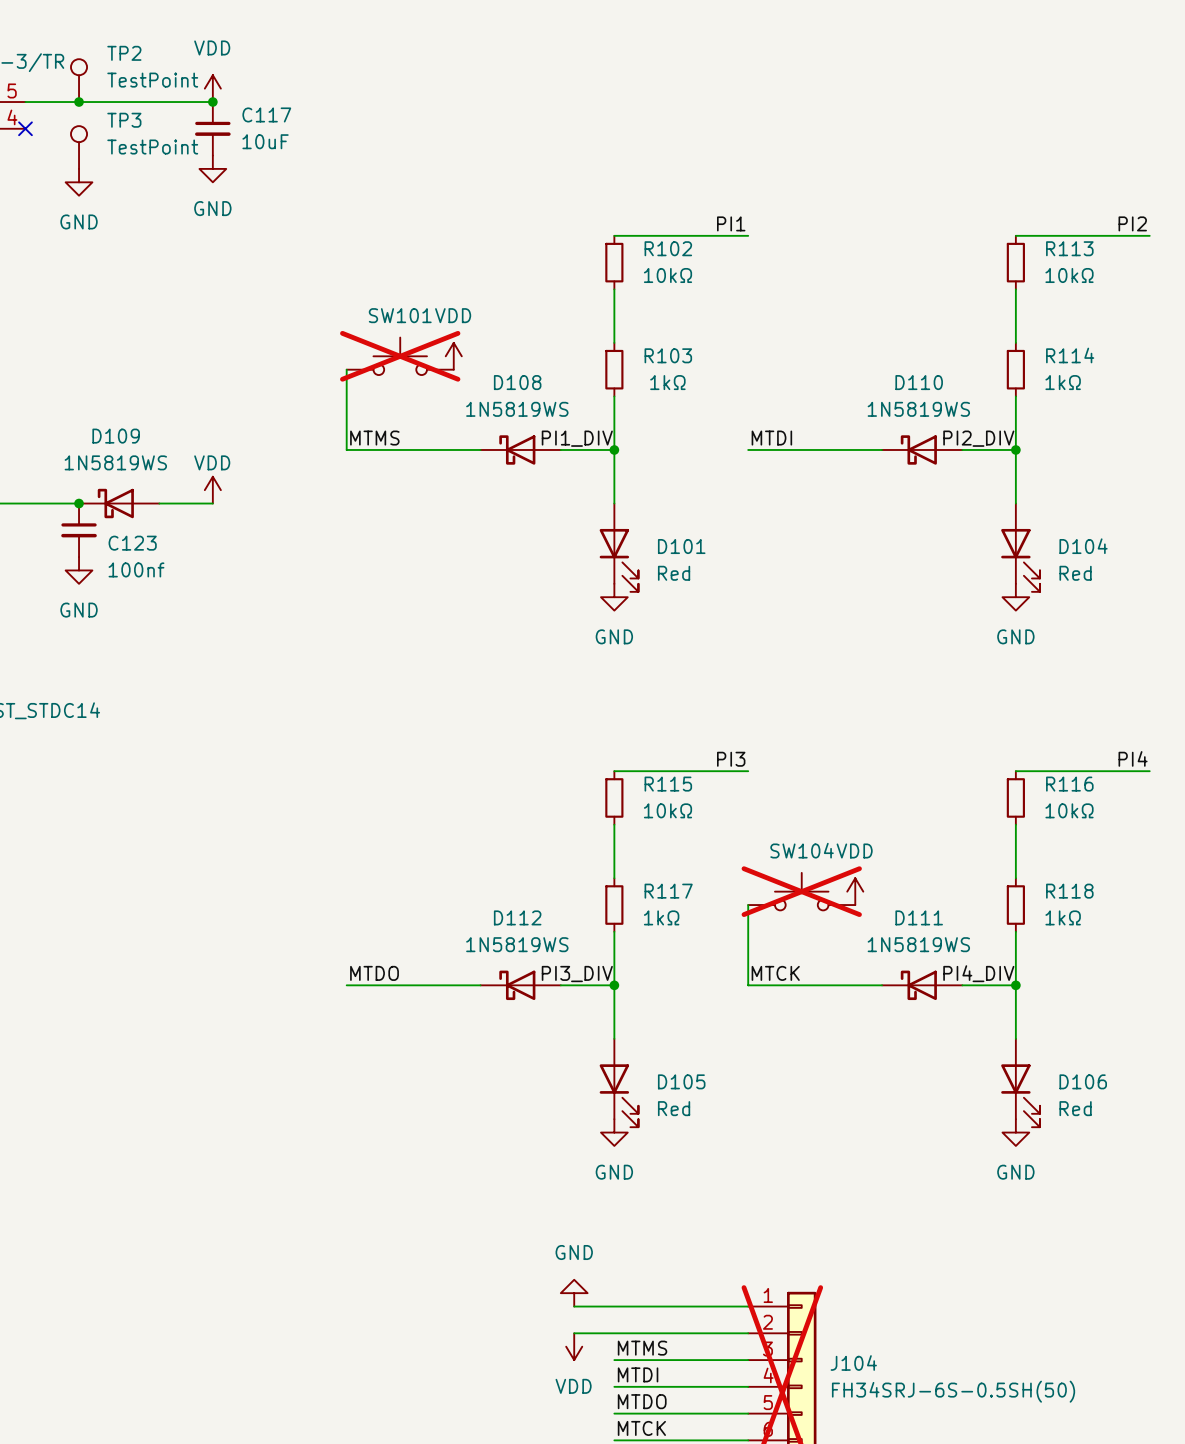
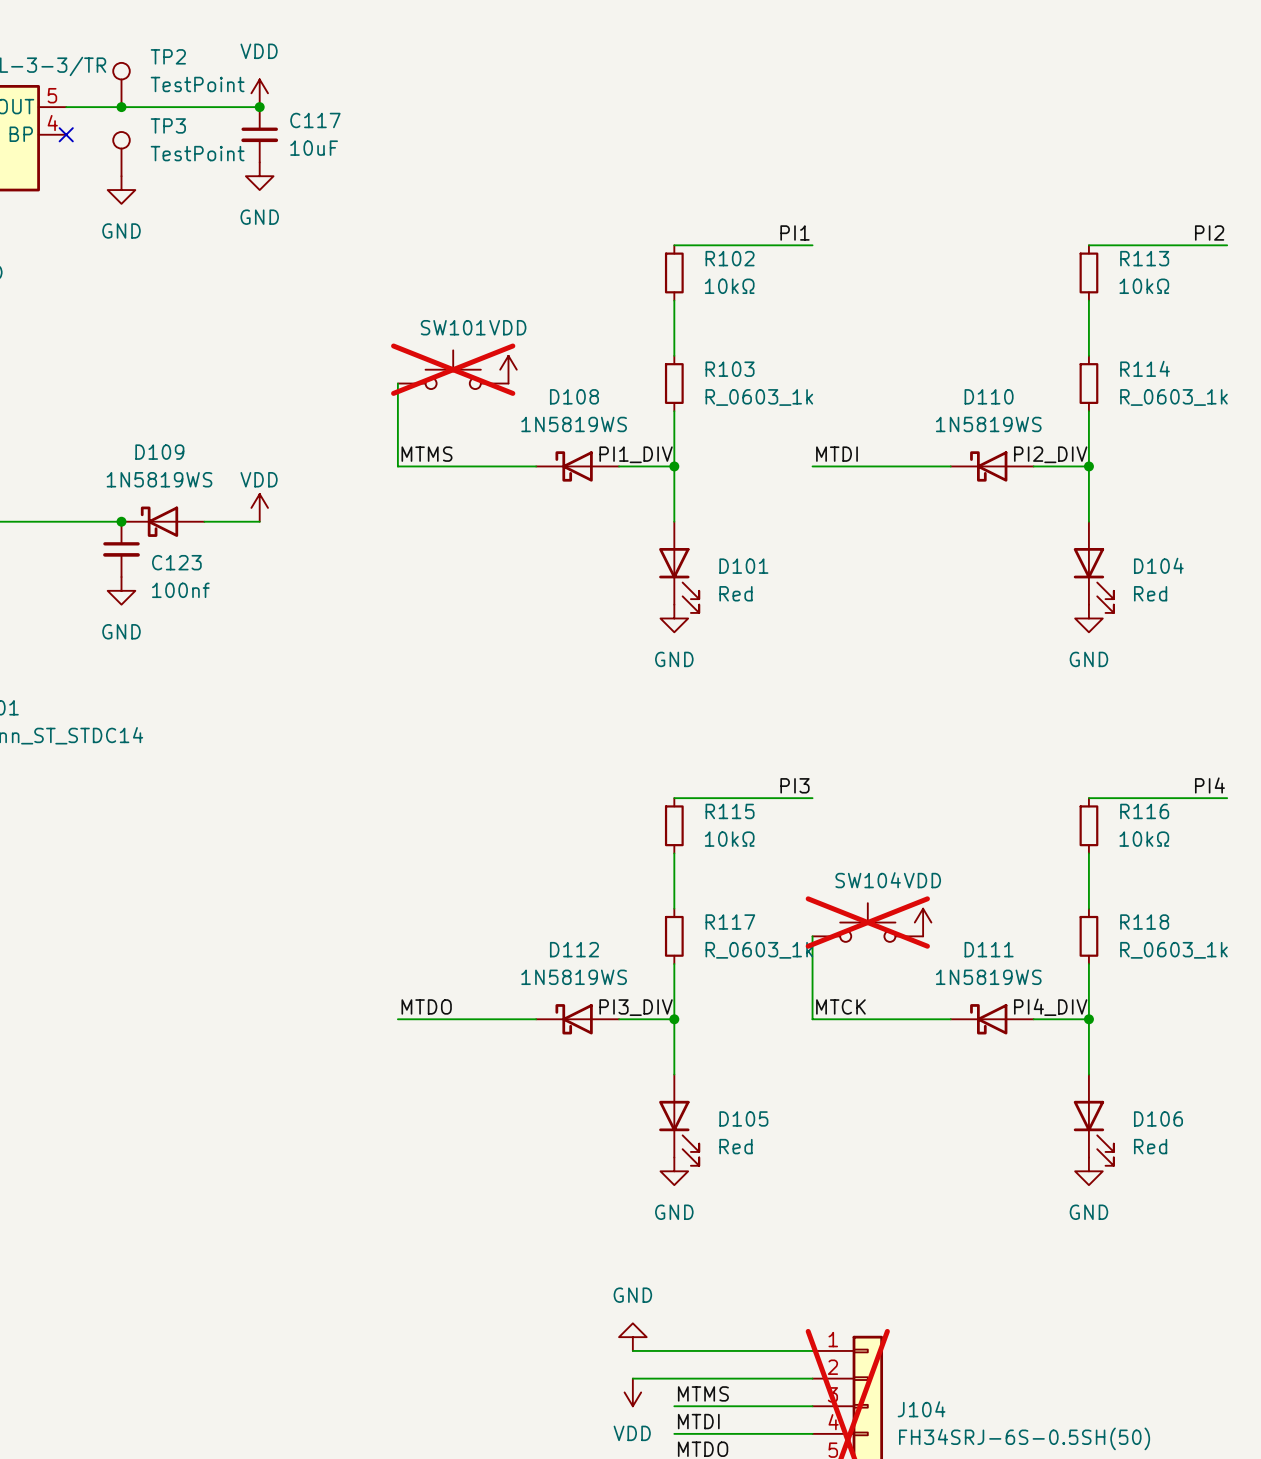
R103 text: 1kΩ (667, 382) -> none
R114 text: 1kΩ (1063, 382) -> none
R103 value: none -> R_0603_1k (759, 397)
R114 value: none -> R_0603_1k (1173, 397)
R117 text: 1kΩ (661, 917) -> none
R118 text: 1kΩ (1063, 917) -> none
R117 value: none -> R_0603_1k (759, 950)
R118 value: none -> R_0603_1k (1173, 950)

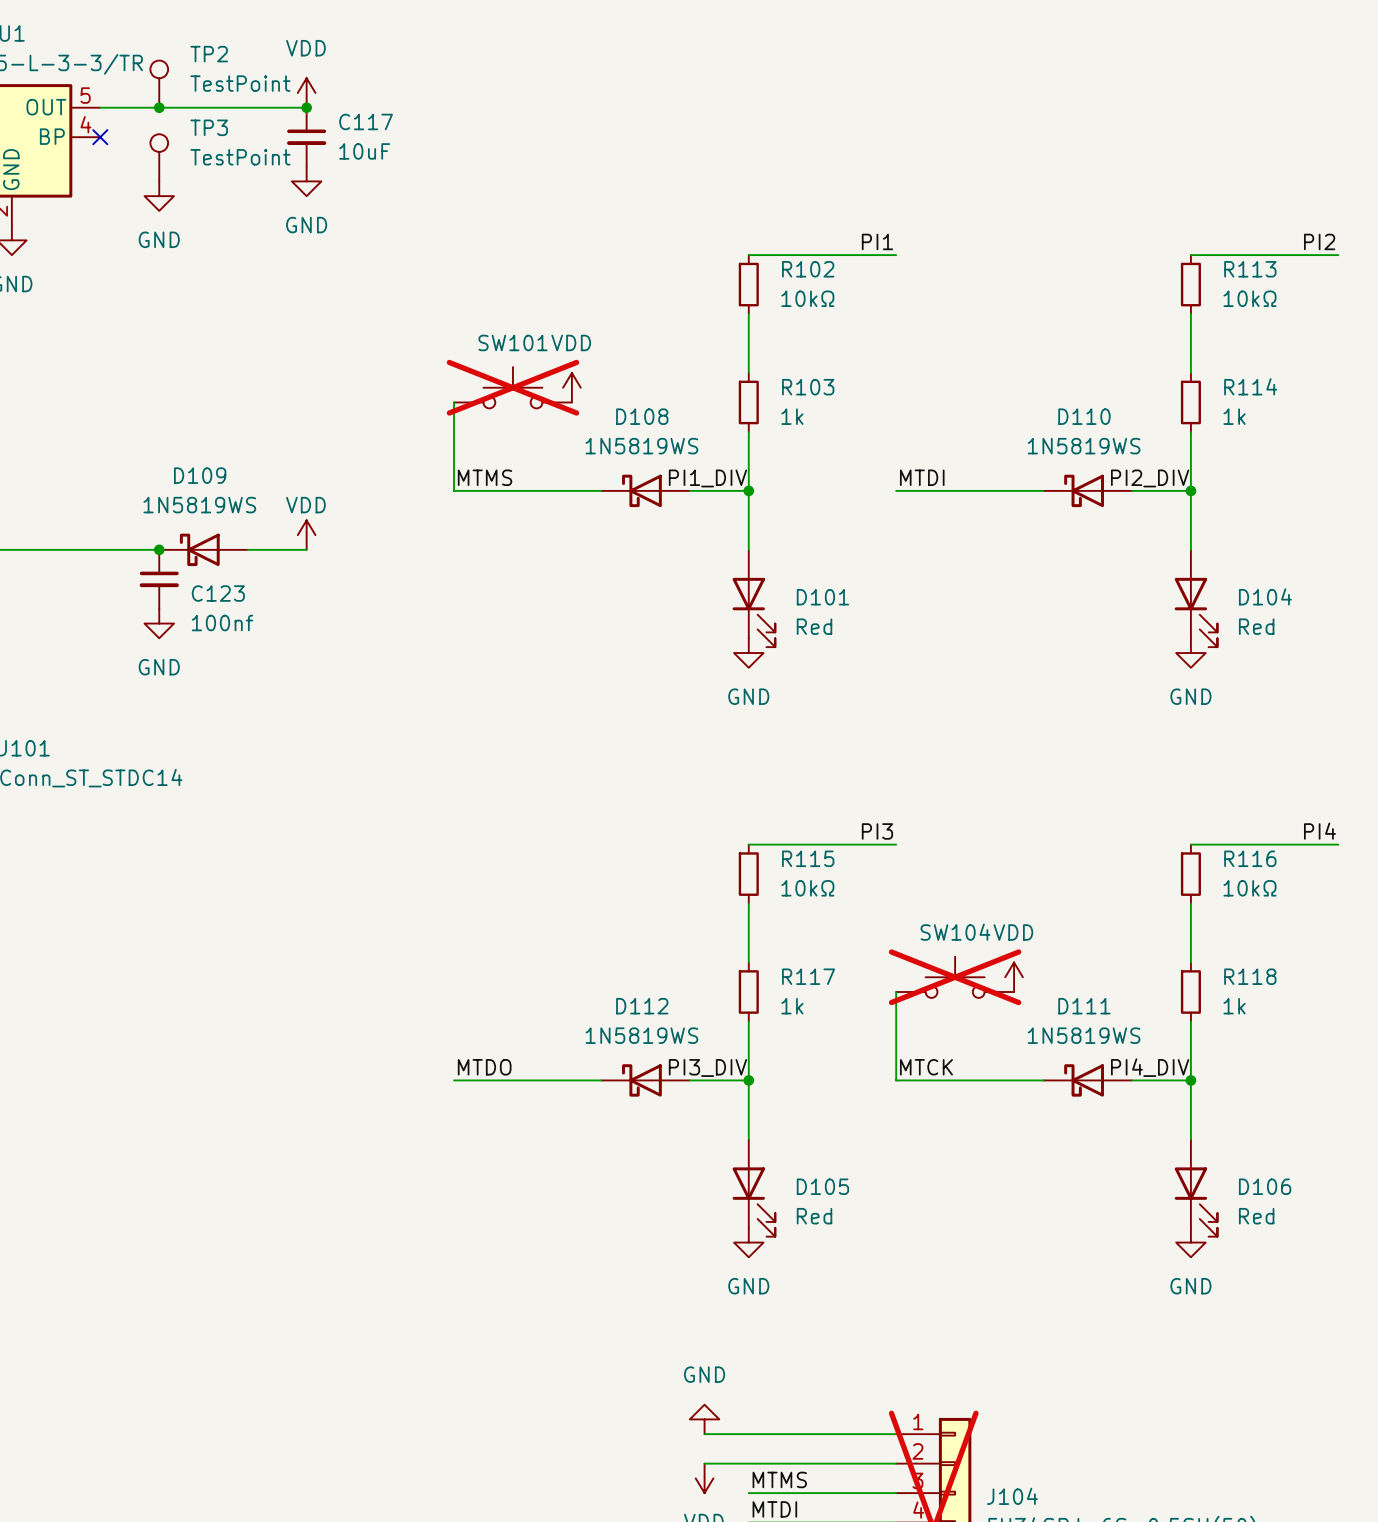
R103 value: R_0603_1k (759, 397) -> 1k (792, 416)
R114 value: R_0603_1k (1173, 397) -> 1k (1234, 416)
R117 value: R_0603_1k (759, 950) -> 1k (792, 1006)
R118 value: R_0603_1k (1173, 950) -> 1k (1234, 1006)

